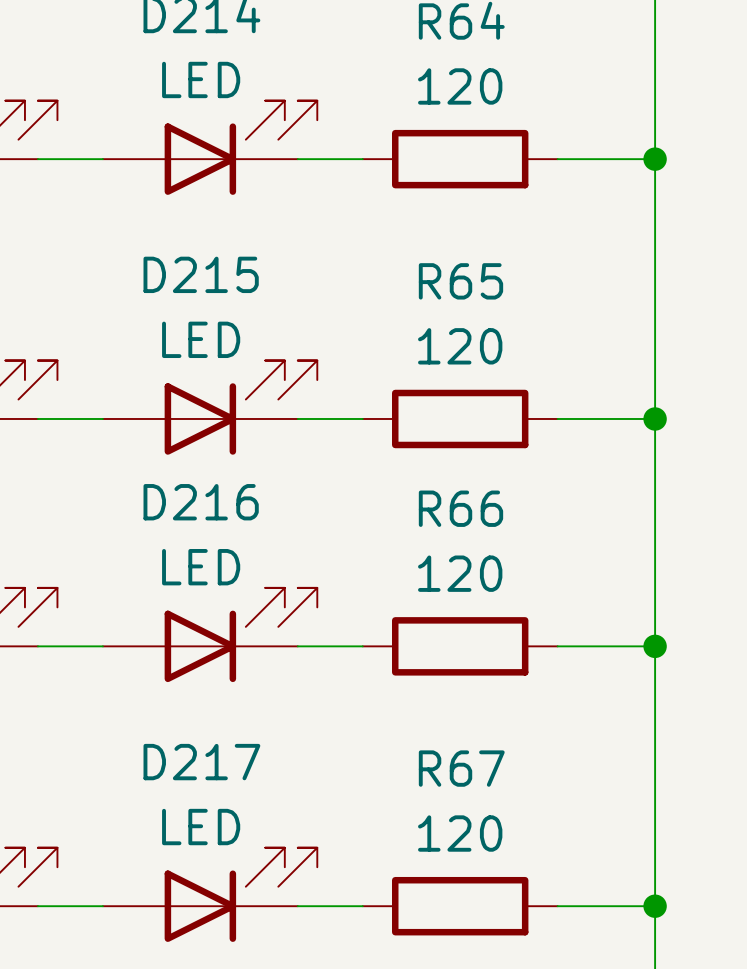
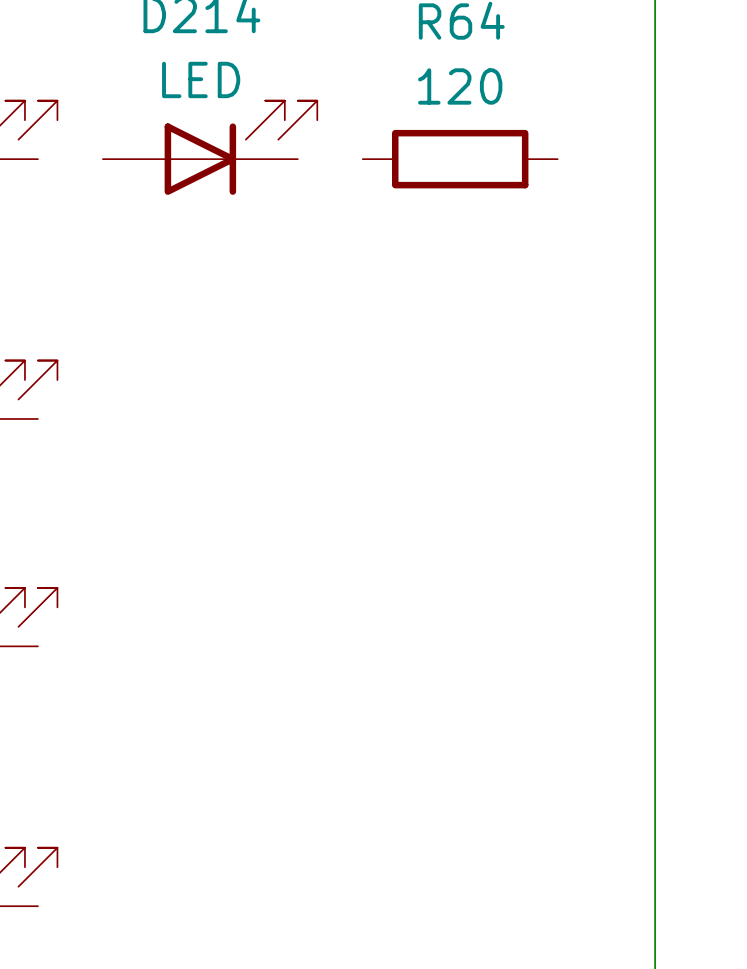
wire: (37, 159) (102, 159) -> none
wire: (297, 159) (362, 159) -> none
wire: (557, 159) (655, 159) -> none
junction: (655, 159) -> none
D215: LED (210, 407) -> none
wire: (37, 418) (102, 418) -> none
wire: (297, 418) (362, 418) -> none
R65: 120 (460, 418) -> none
wire: (557, 418) (655, 418) -> none
junction: (655, 418) -> none
D216: LED (210, 634) -> none
wire: (37, 646) (102, 646) -> none
wire: (297, 646) (362, 646) -> none
R66: 120 (460, 646) -> none
wire: (557, 646) (655, 646) -> none
junction: (655, 646) -> none
D217: LED (210, 894) -> none
wire: (37, 906) (102, 906) -> none
wire: (297, 906) (362, 906) -> none
R67: 120 (460, 906) -> none
wire: (557, 906) (655, 906) -> none
junction: (655, 906) -> none

